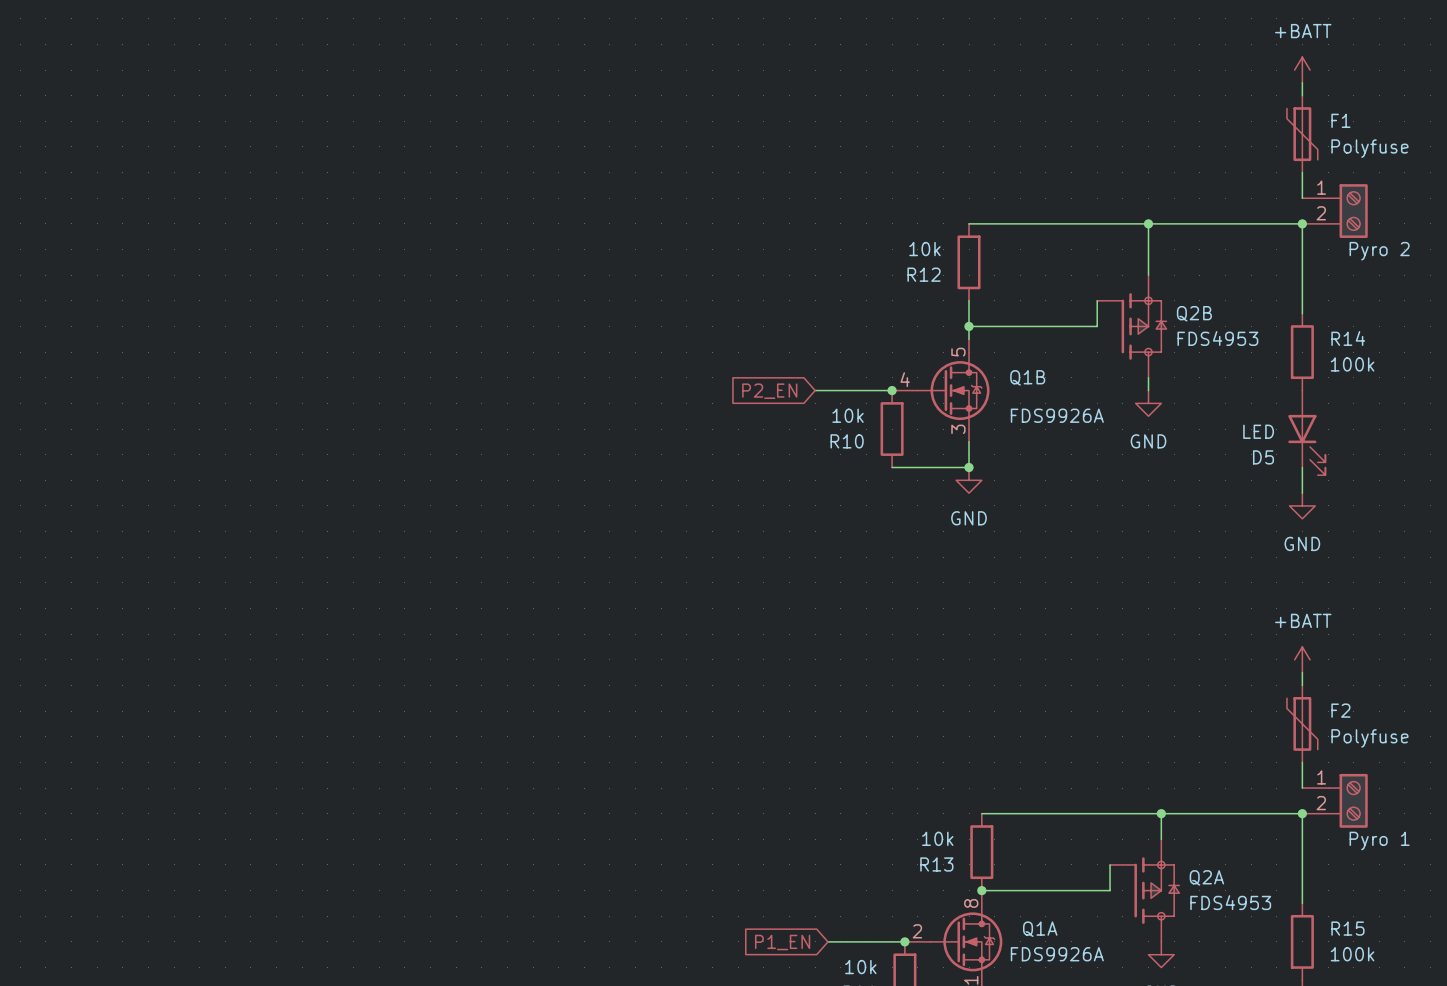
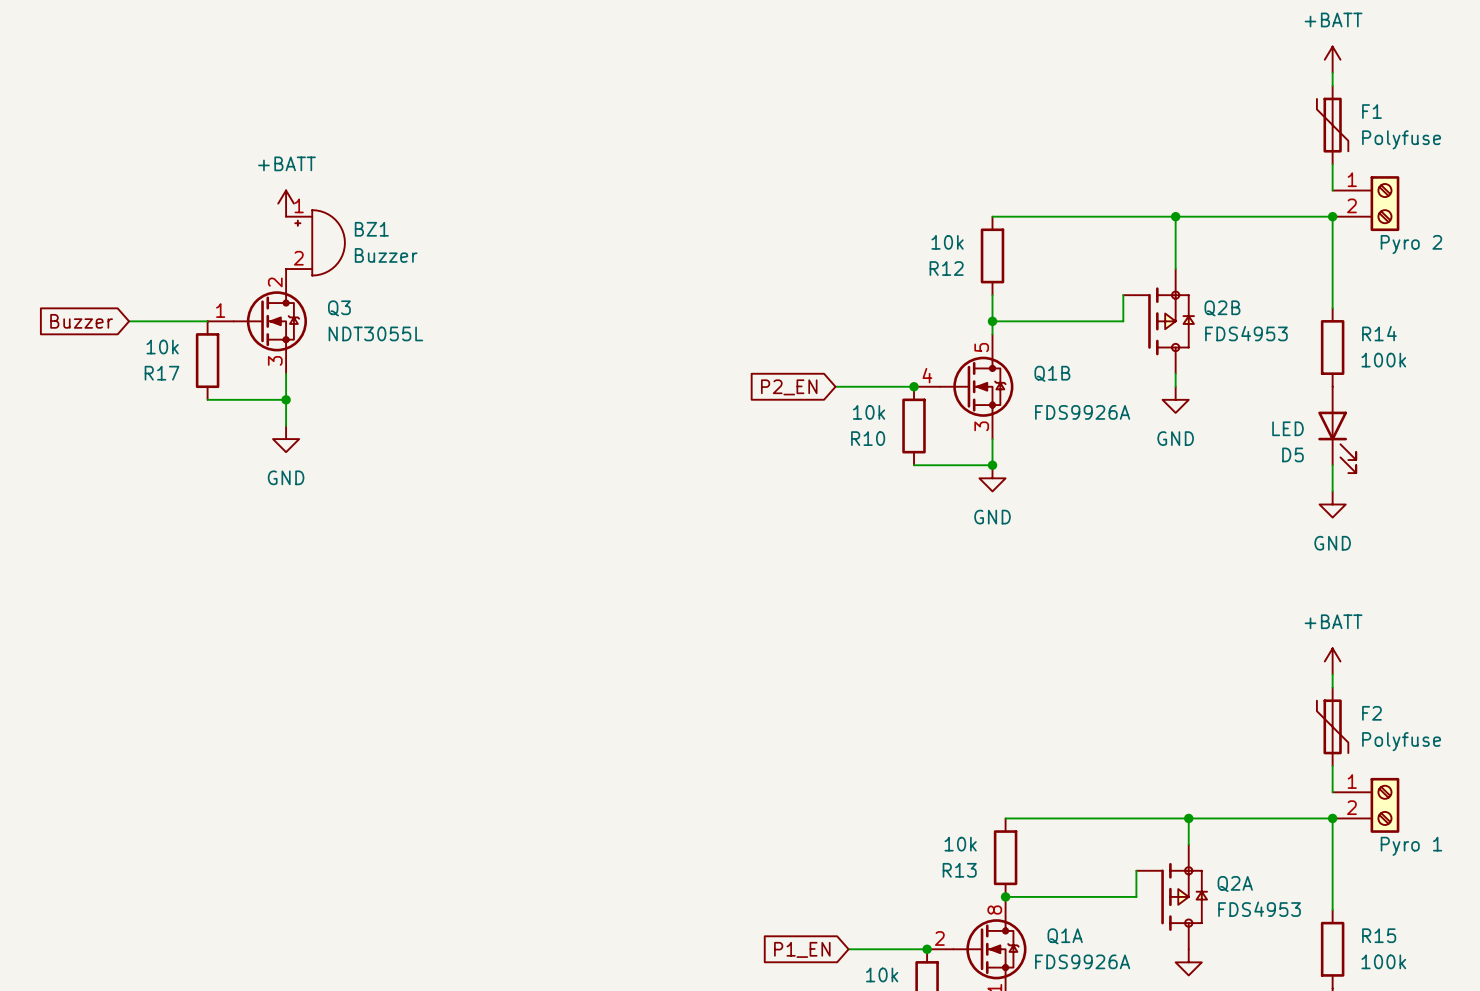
power symbol: none -> +BATT (286, 203)
BZ1: none -> Buzzer (315, 242)
global label: none -> Buzzer (81, 321)
wire: none -> (129, 321) (207, 321)
Q3: none -> NDT3055L (257, 321)
R17: none -> 10k (207, 360)
wire: none -> (286, 373) (286, 426)
wire: none -> (207, 399) (286, 399)
junction: none -> (286, 399)
power symbol: none -> GND (286, 439)

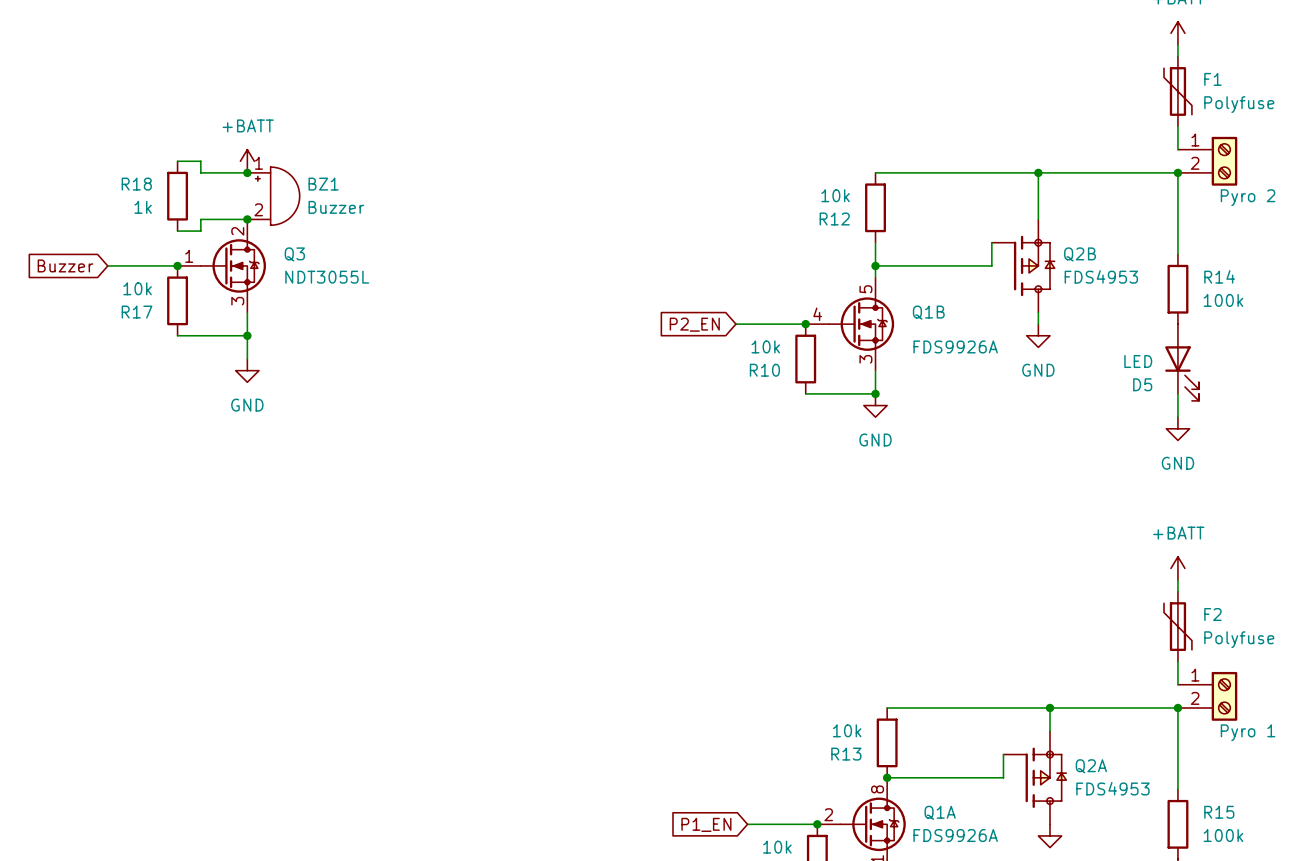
wire: none -> (177, 161) (200, 161) (200, 172) (247, 172)
junction: none -> (247, 172)
R18: none -> 1k (177, 196)
wire: none -> (247, 219) (200, 219) (200, 231) (177, 231)
junction: none -> (247, 219)
junction: none -> (177, 265)

